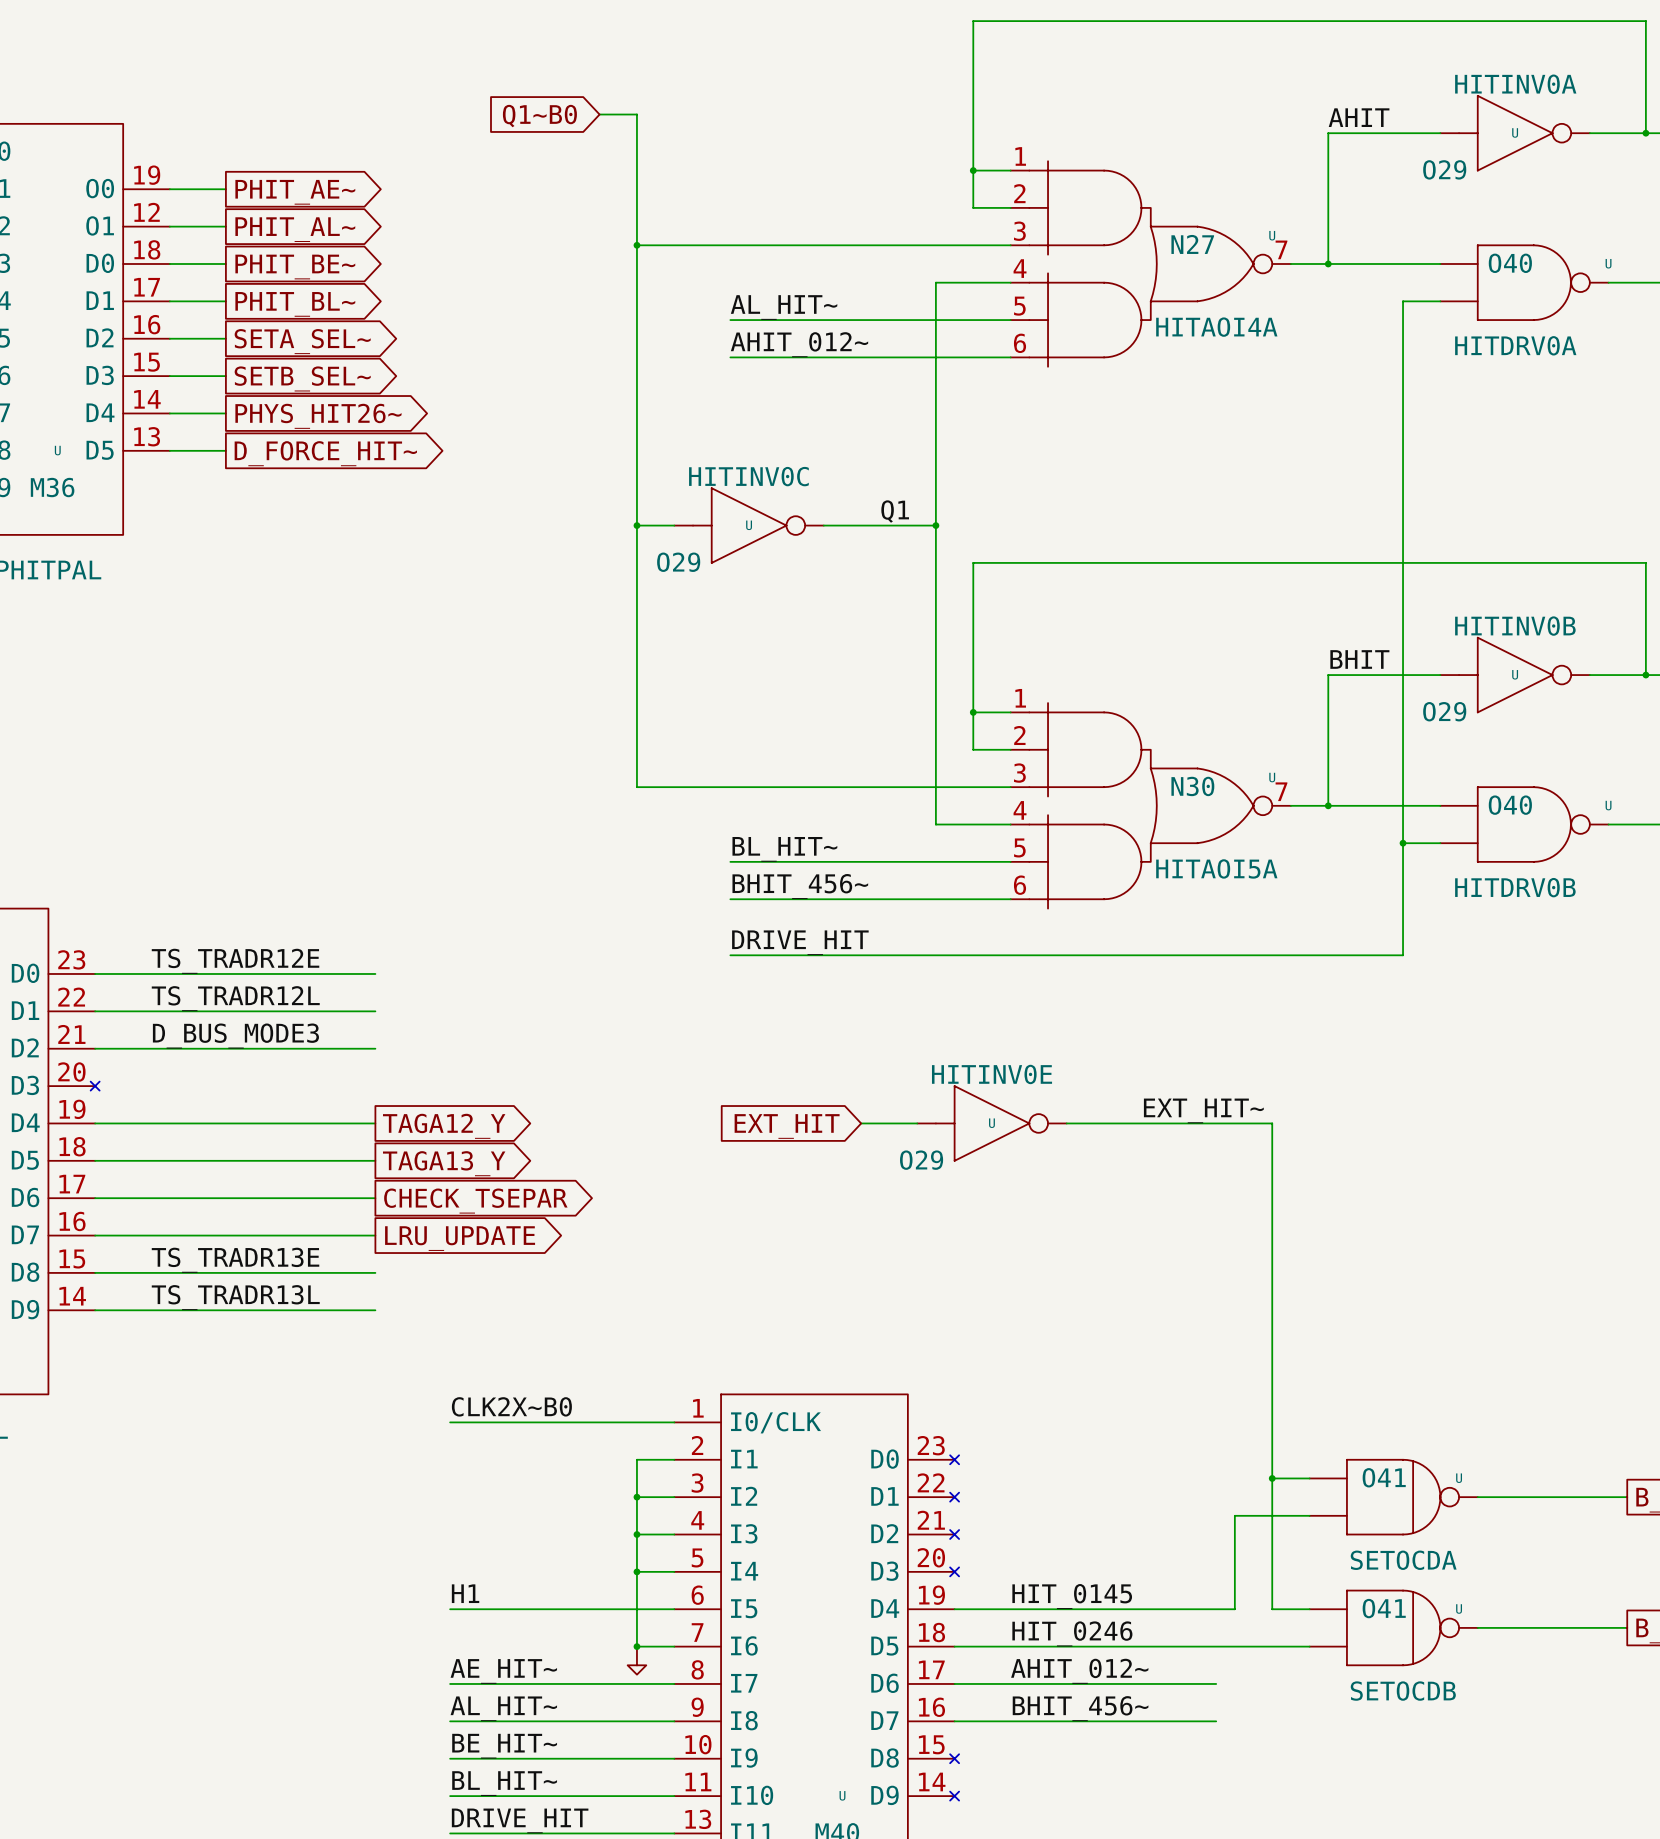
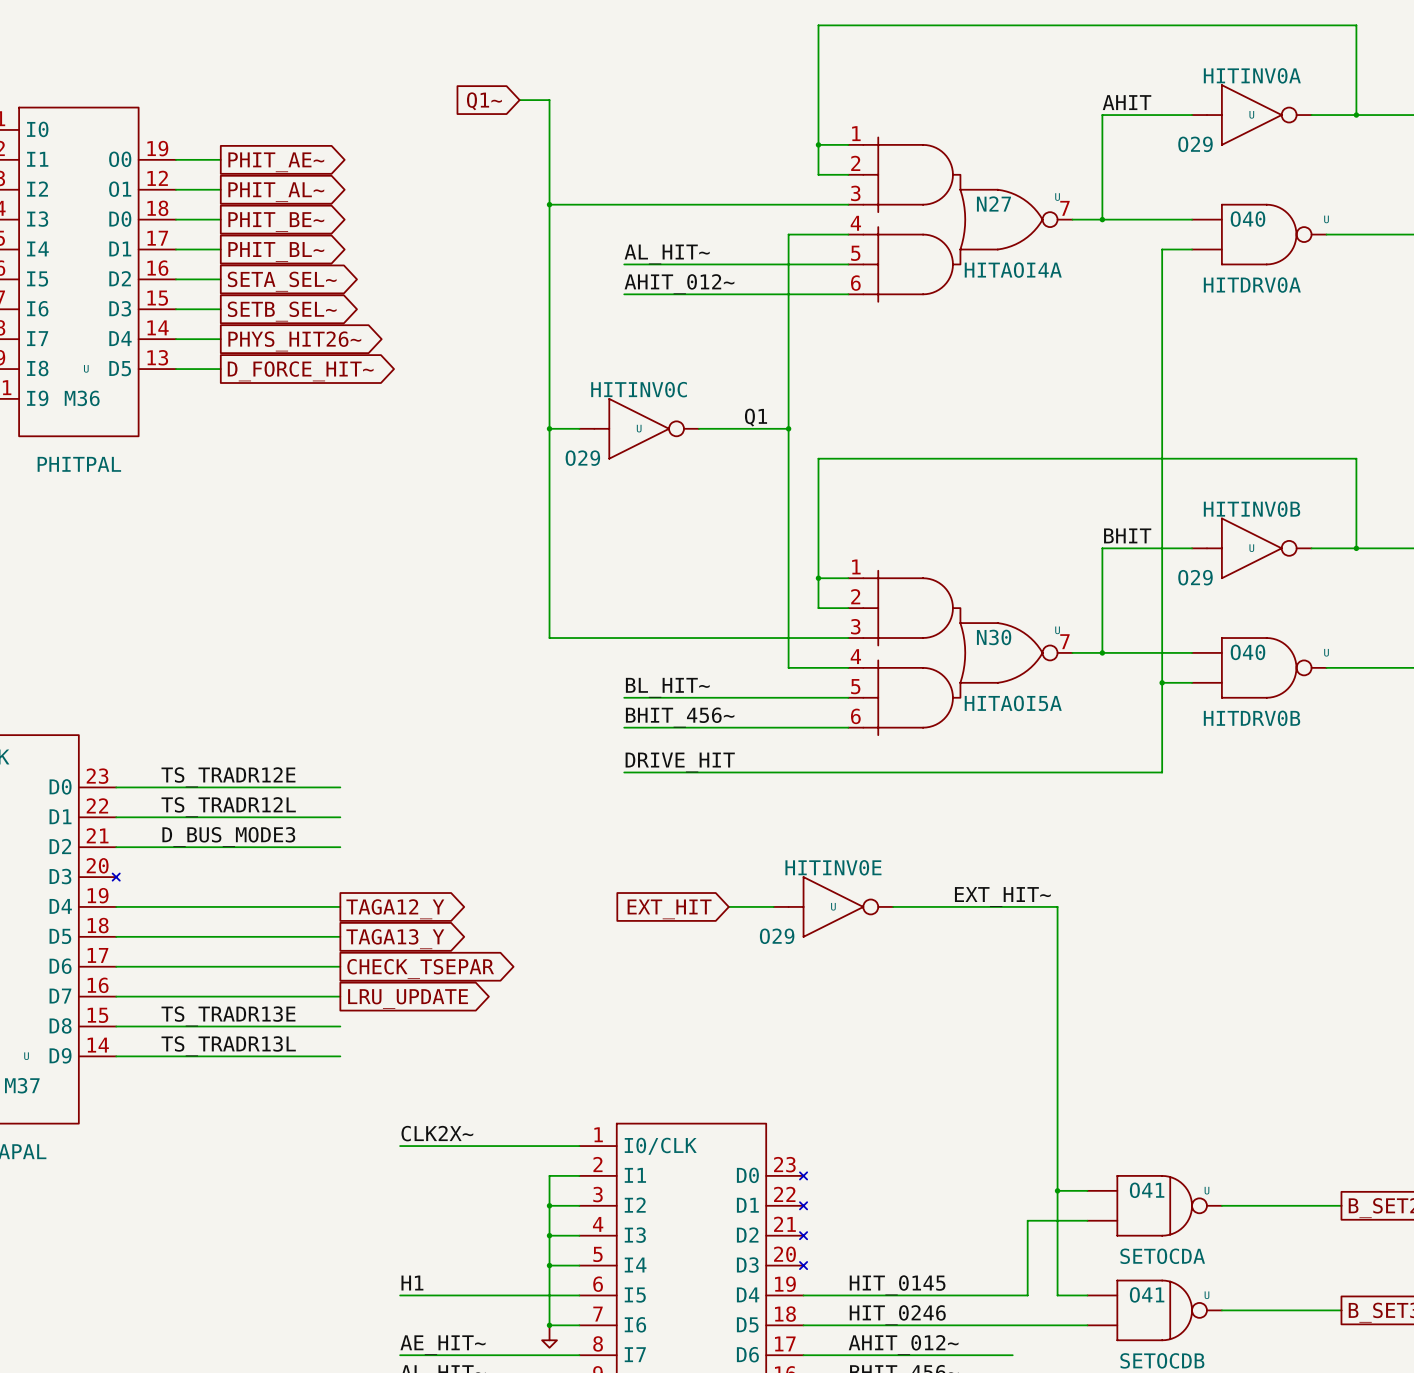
global label: Q1~B0 (539, 116) -> Q1~ (484, 101)
label: CLK2X~B0 (511, 1406) -> CLK2X~ (437, 1133)

